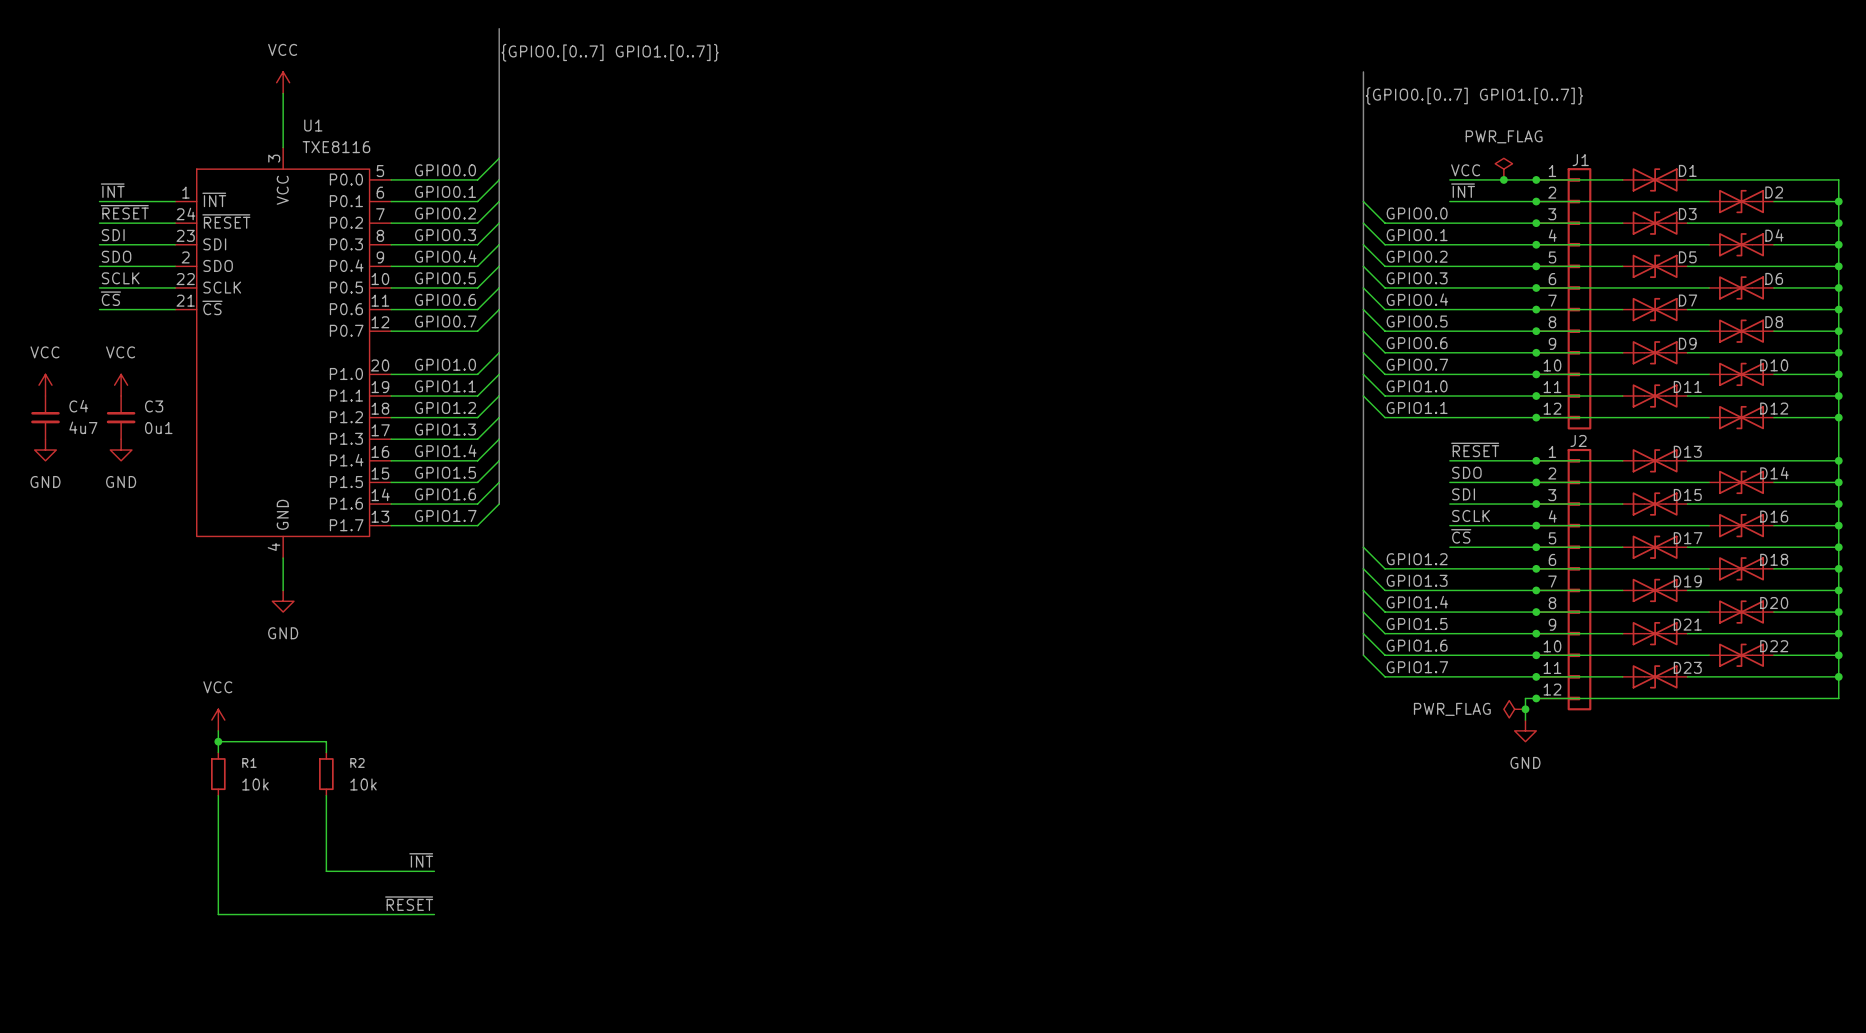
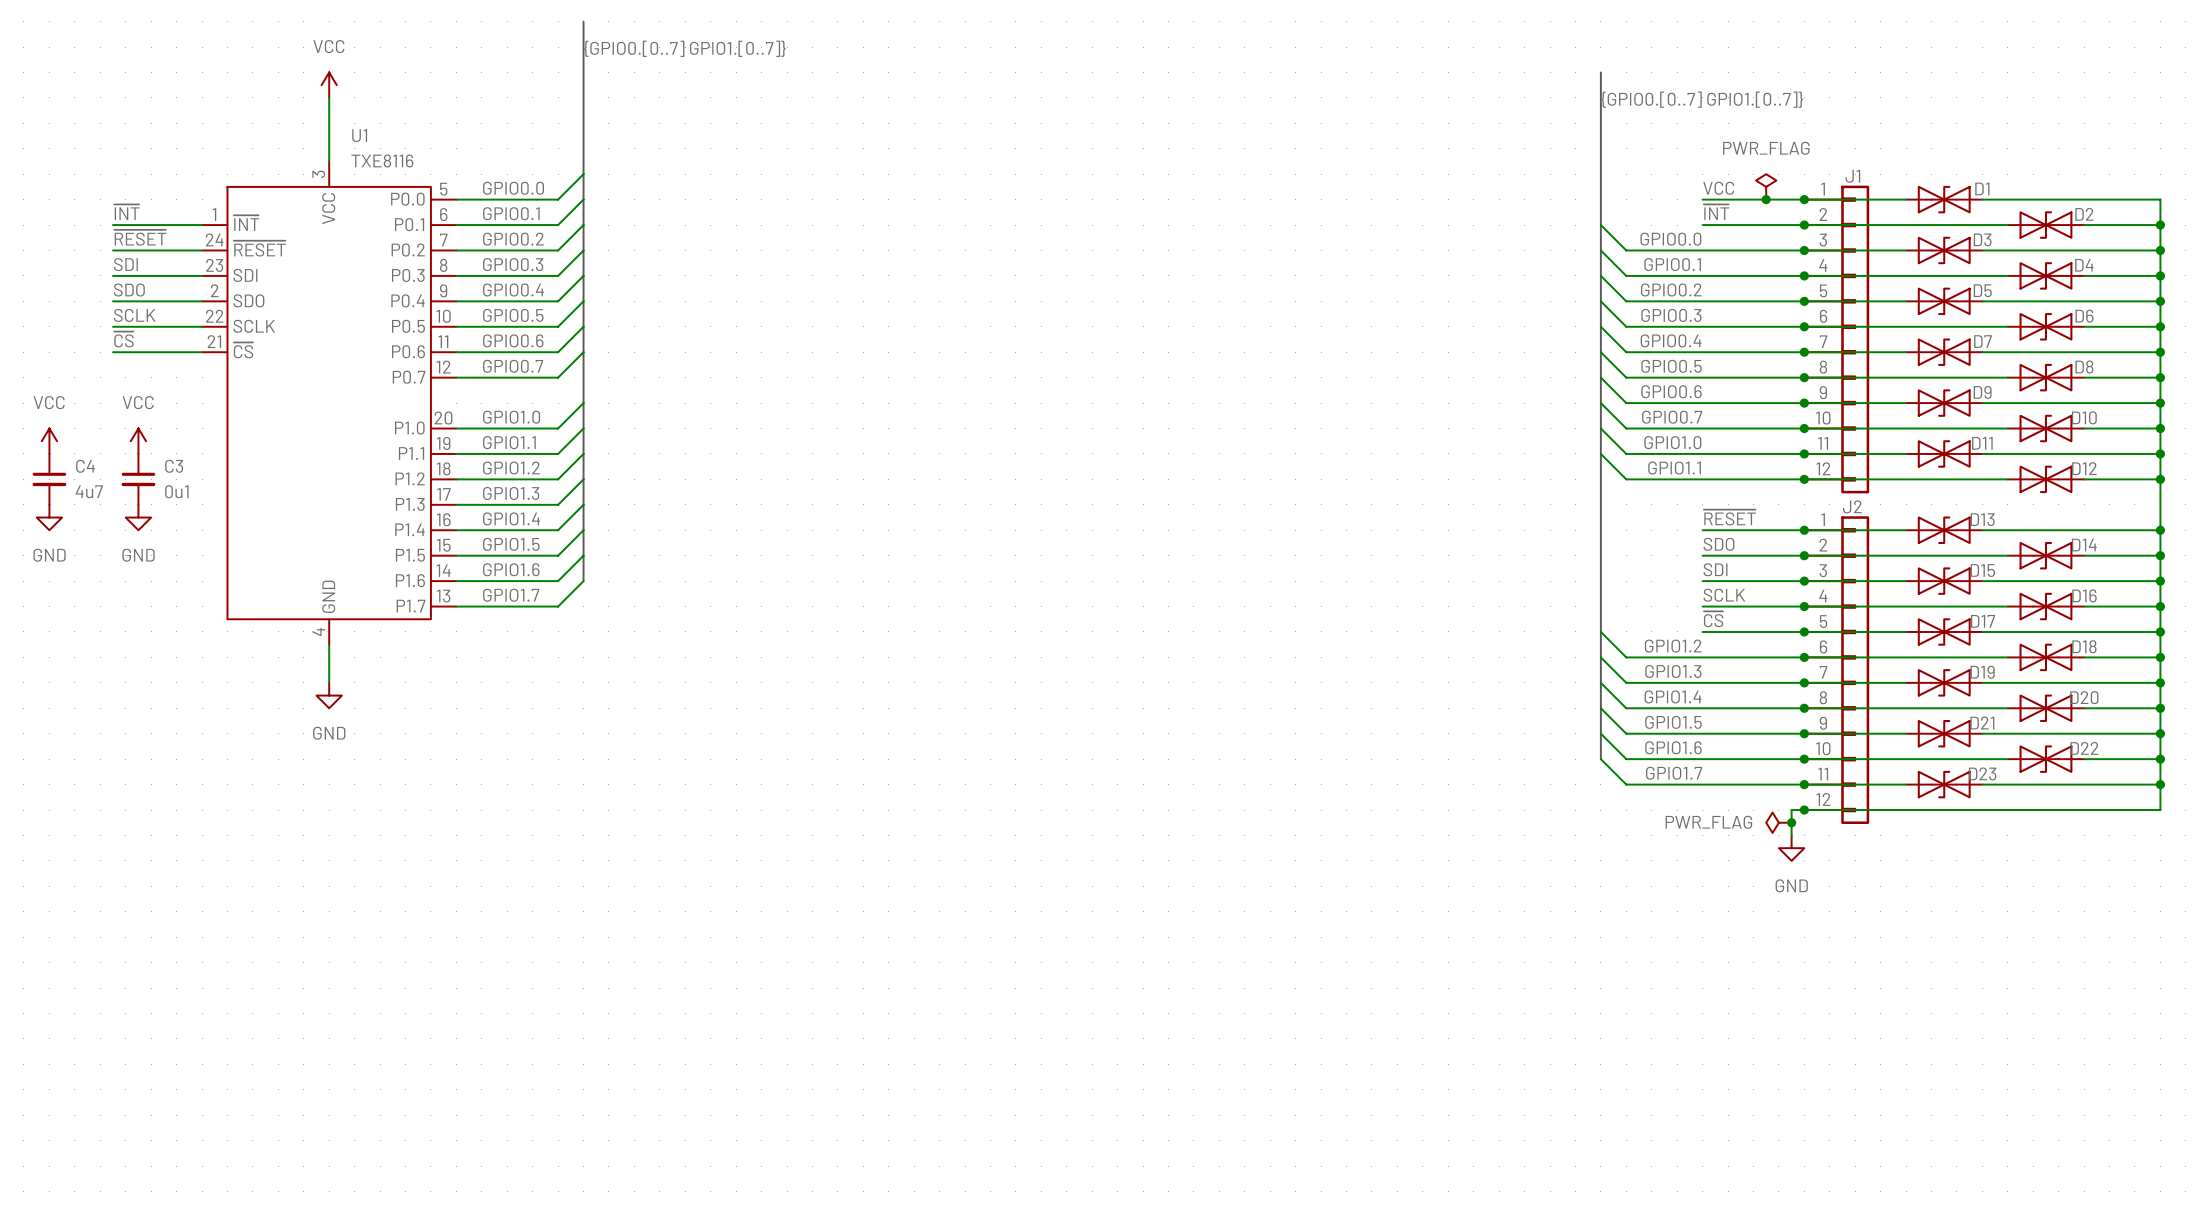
power symbol: VCC (218, 720) -> none
wire: (218, 730) (218, 752) -> none
wire: (218, 741) (326, 741) (326, 752) -> none
junction: (218, 741) -> none
R1: 10k (218, 774) -> none
R2: 10k (326, 774) -> none
wire: (218, 795) (218, 914) (434, 914) -> none
wire: (326, 795) (326, 871) (434, 871) -> none
label: ~{INT} (421, 860) -> none
label: ~{RESET} (409, 903) -> none

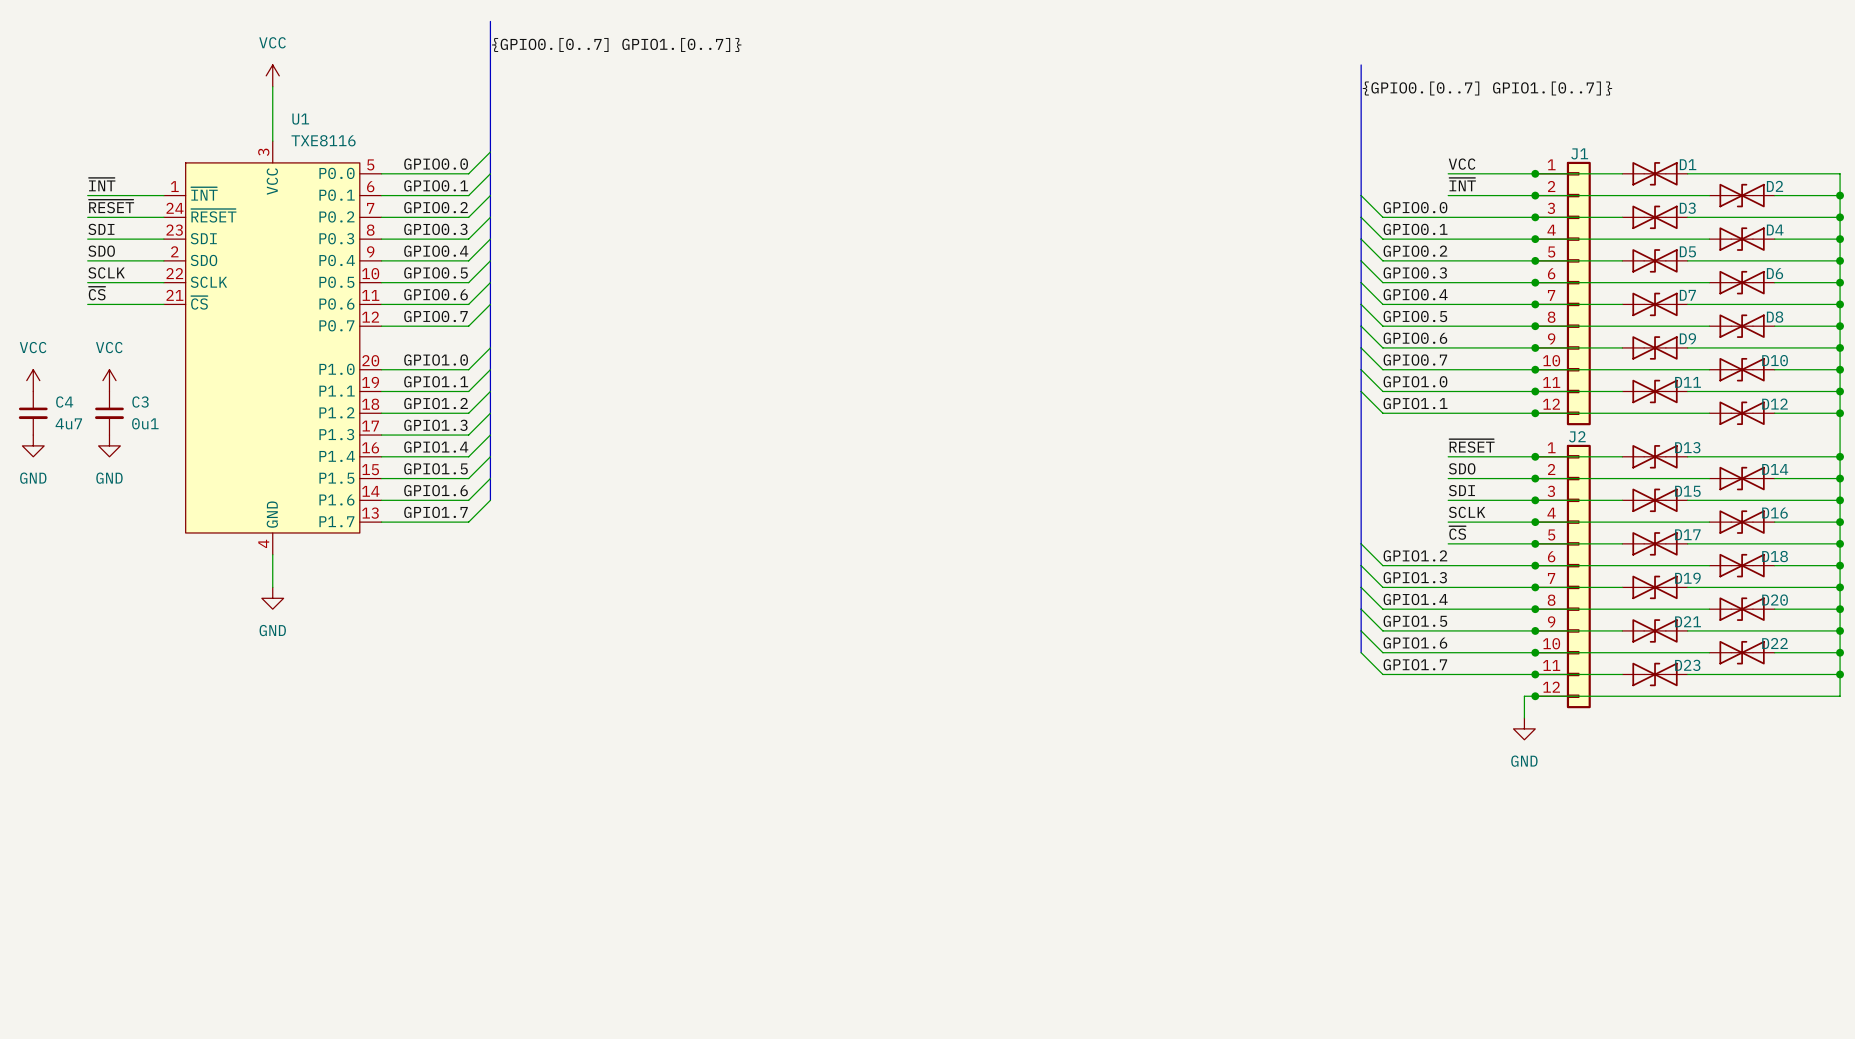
power symbol: PWR_FLAG (1766, 186) -> none
junction: (1766, 199) -> none
power symbol: PWR_FLAG (1778, 822) -> none
junction: (1791, 822) -> none

